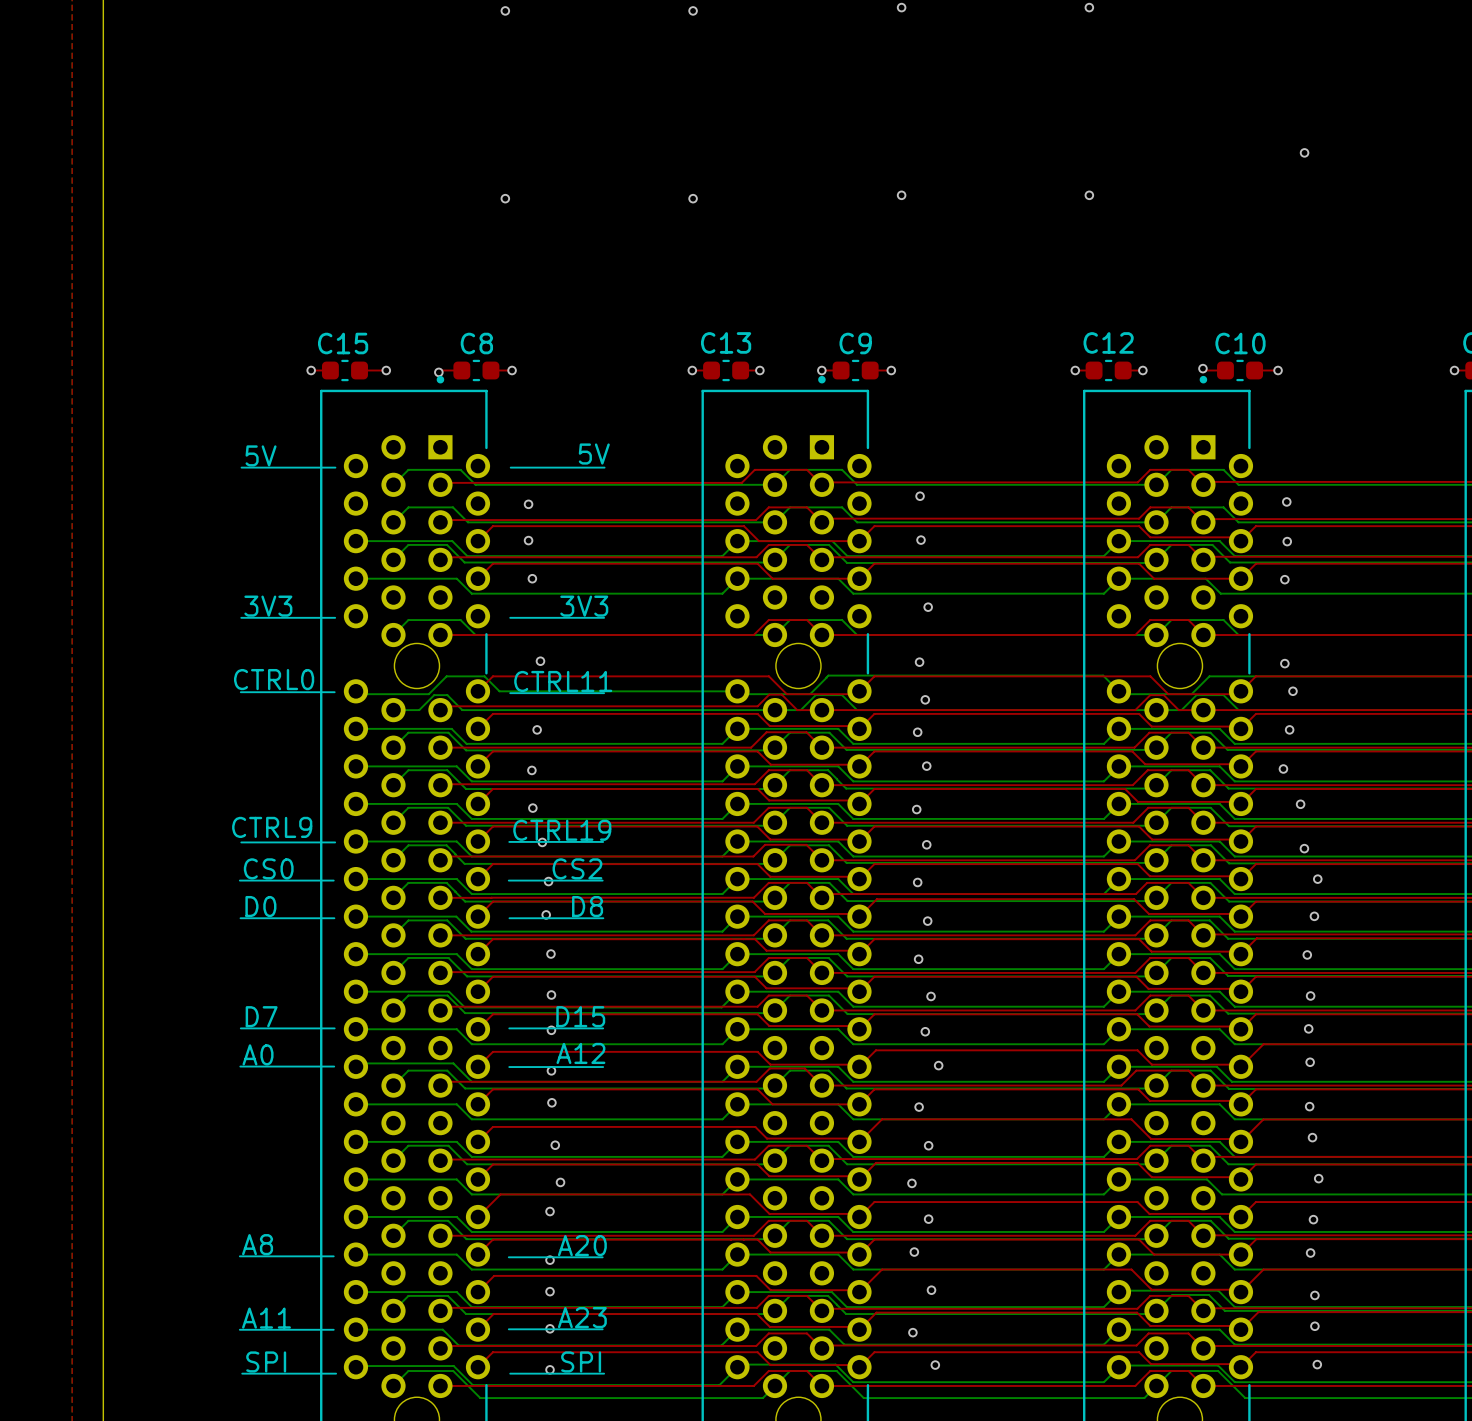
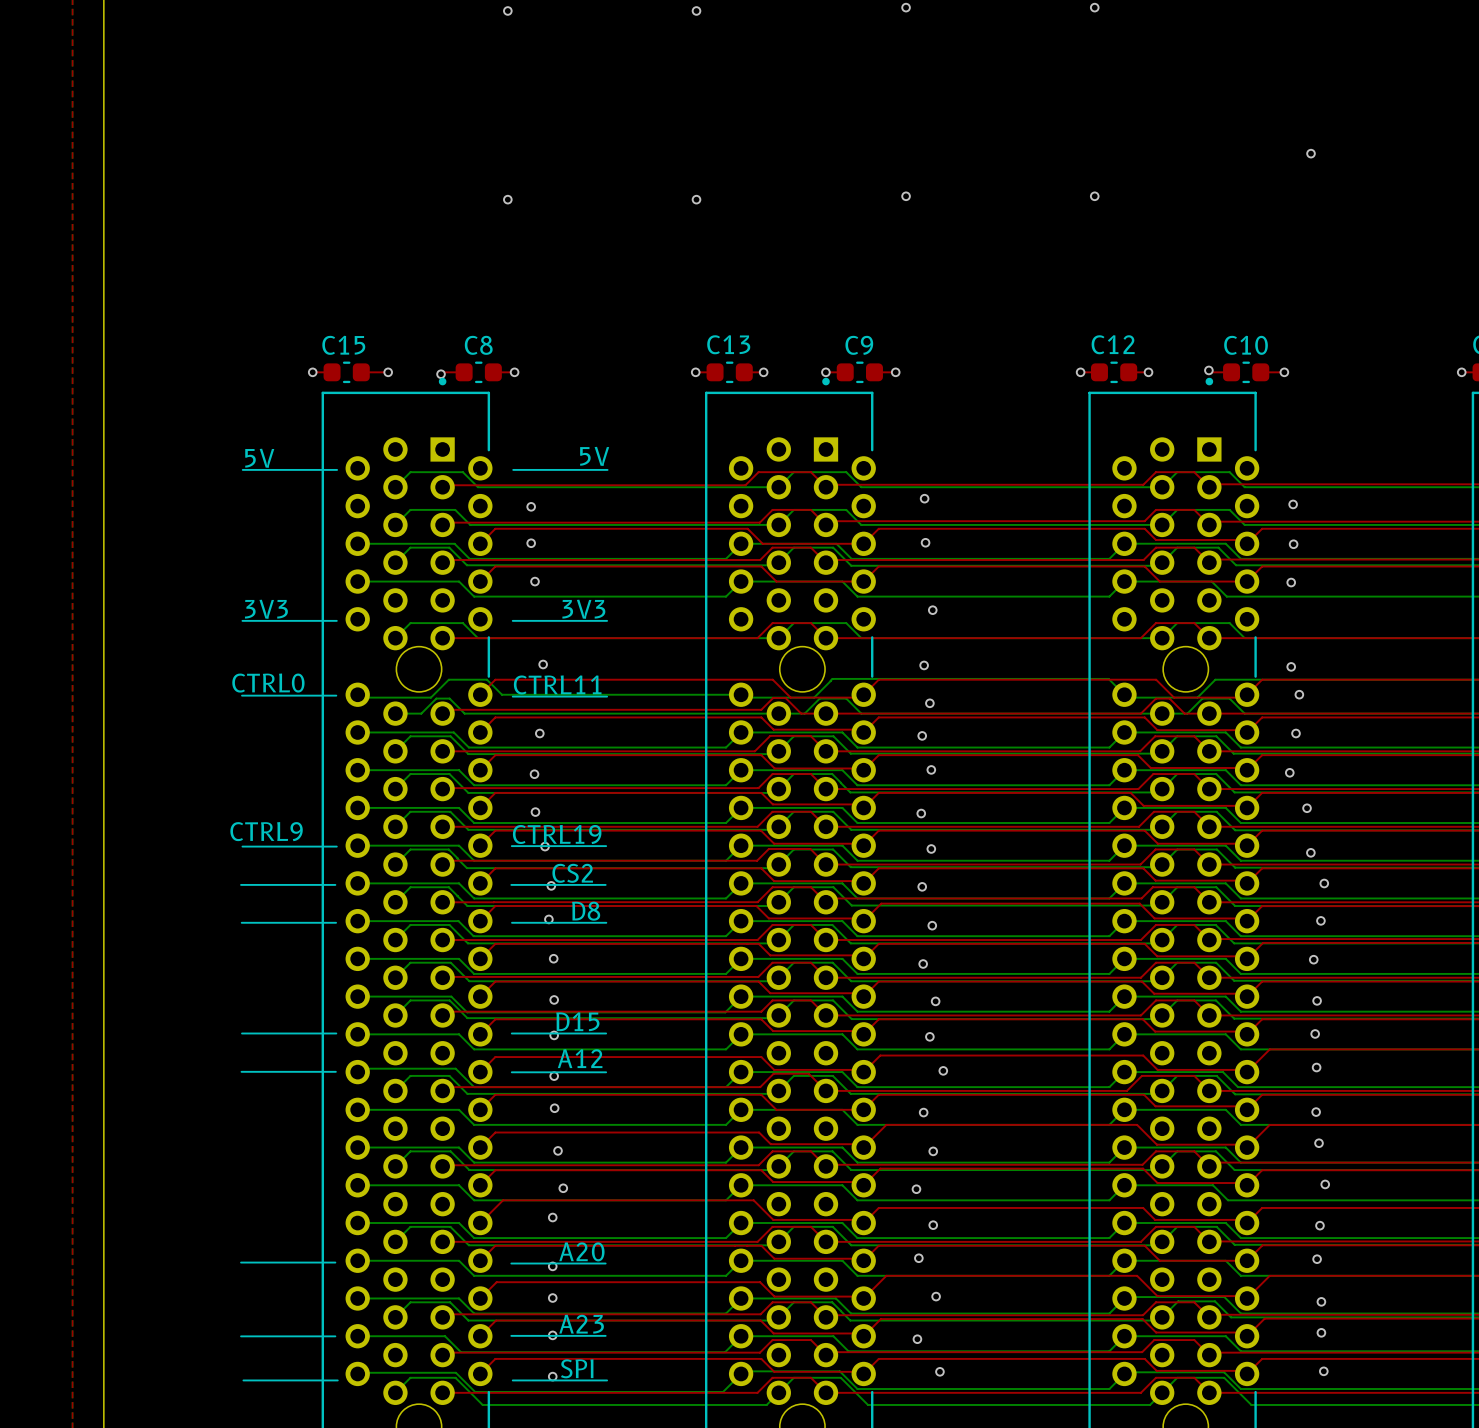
text: CS0 (268, 868) -> none
text: D0 (260, 906) -> none
text: D7 (261, 1016) -> none
text: A0 (258, 1054) -> none
text: A8 (257, 1244) -> none
text: A11 (266, 1318) -> none
text: SPI (266, 1361) -> none

